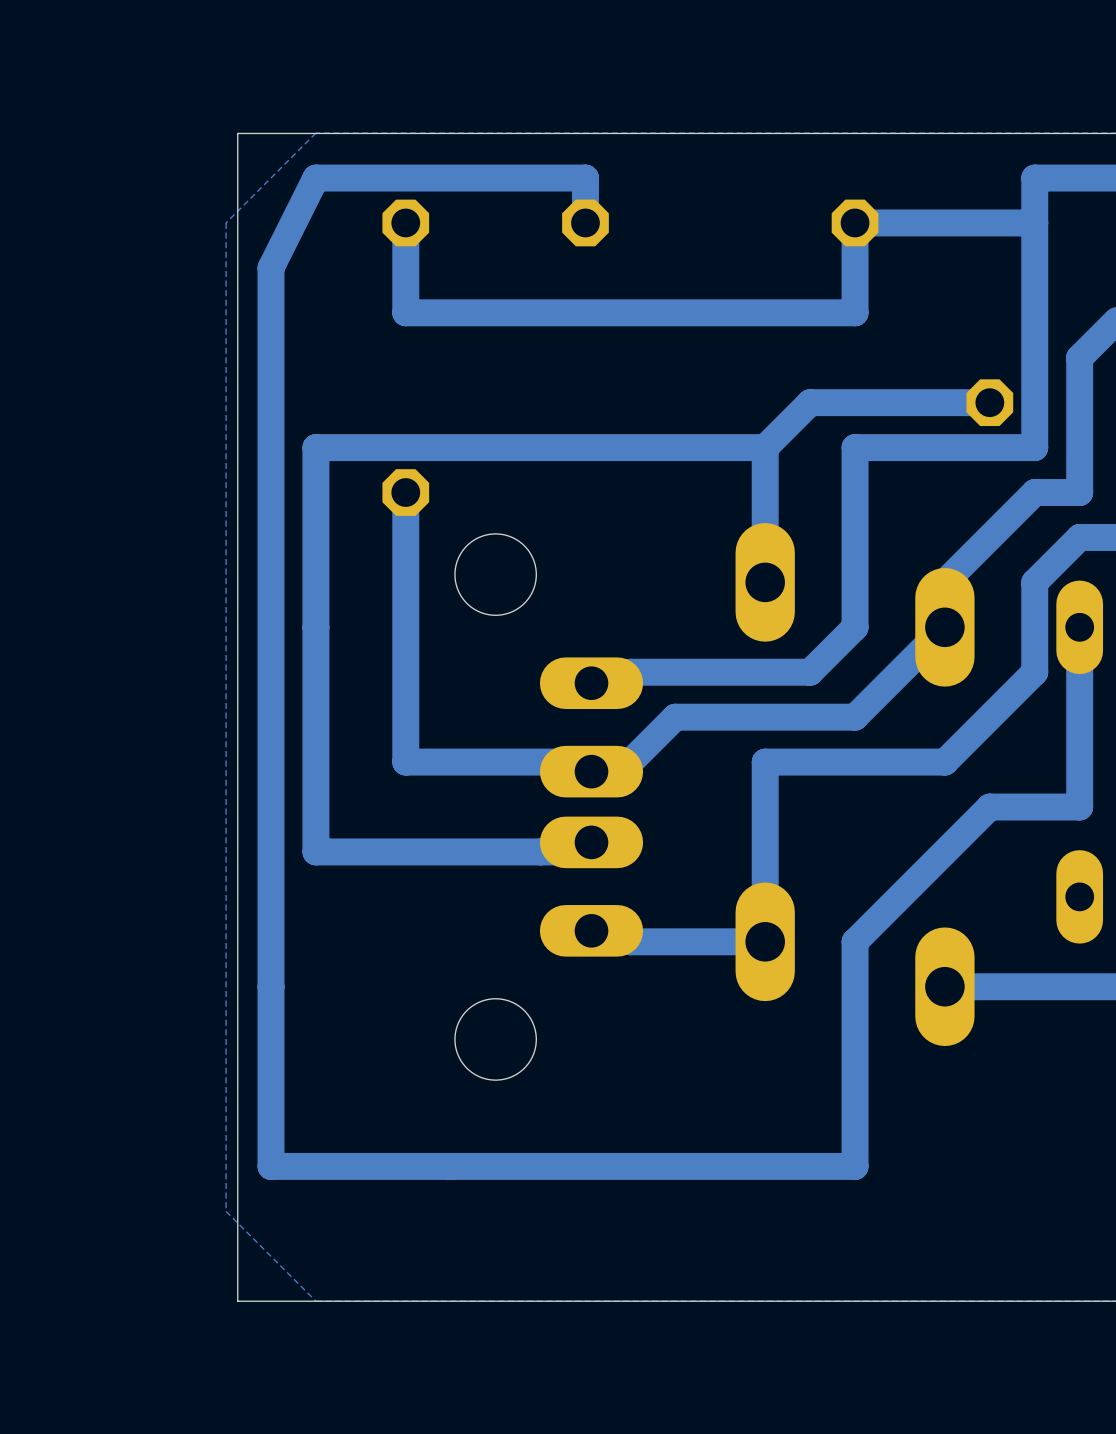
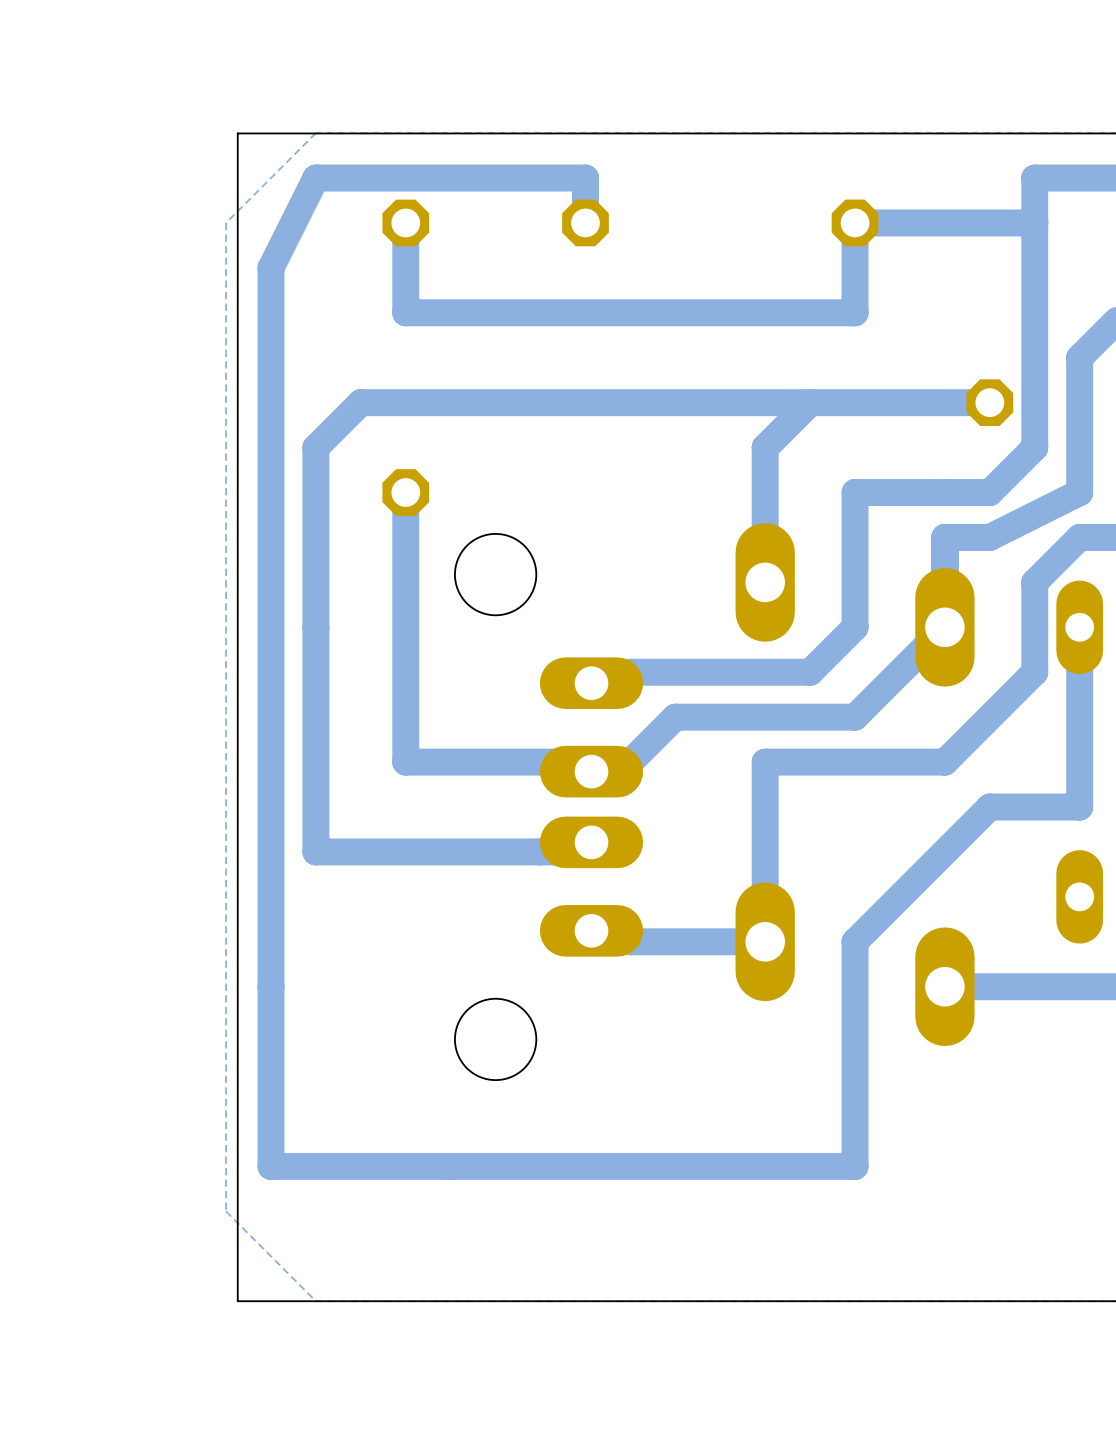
track: (765, 447) (315, 447) -> (810, 402) (360, 402) (315, 447)
track: (1034, 447) (855, 447) (855, 492) -> (1034, 447) (989, 492) (855, 492)
track: (1079, 492) (1034, 492) (944, 582) -> (1079, 492) (989, 537) (944, 537) (944, 582)

